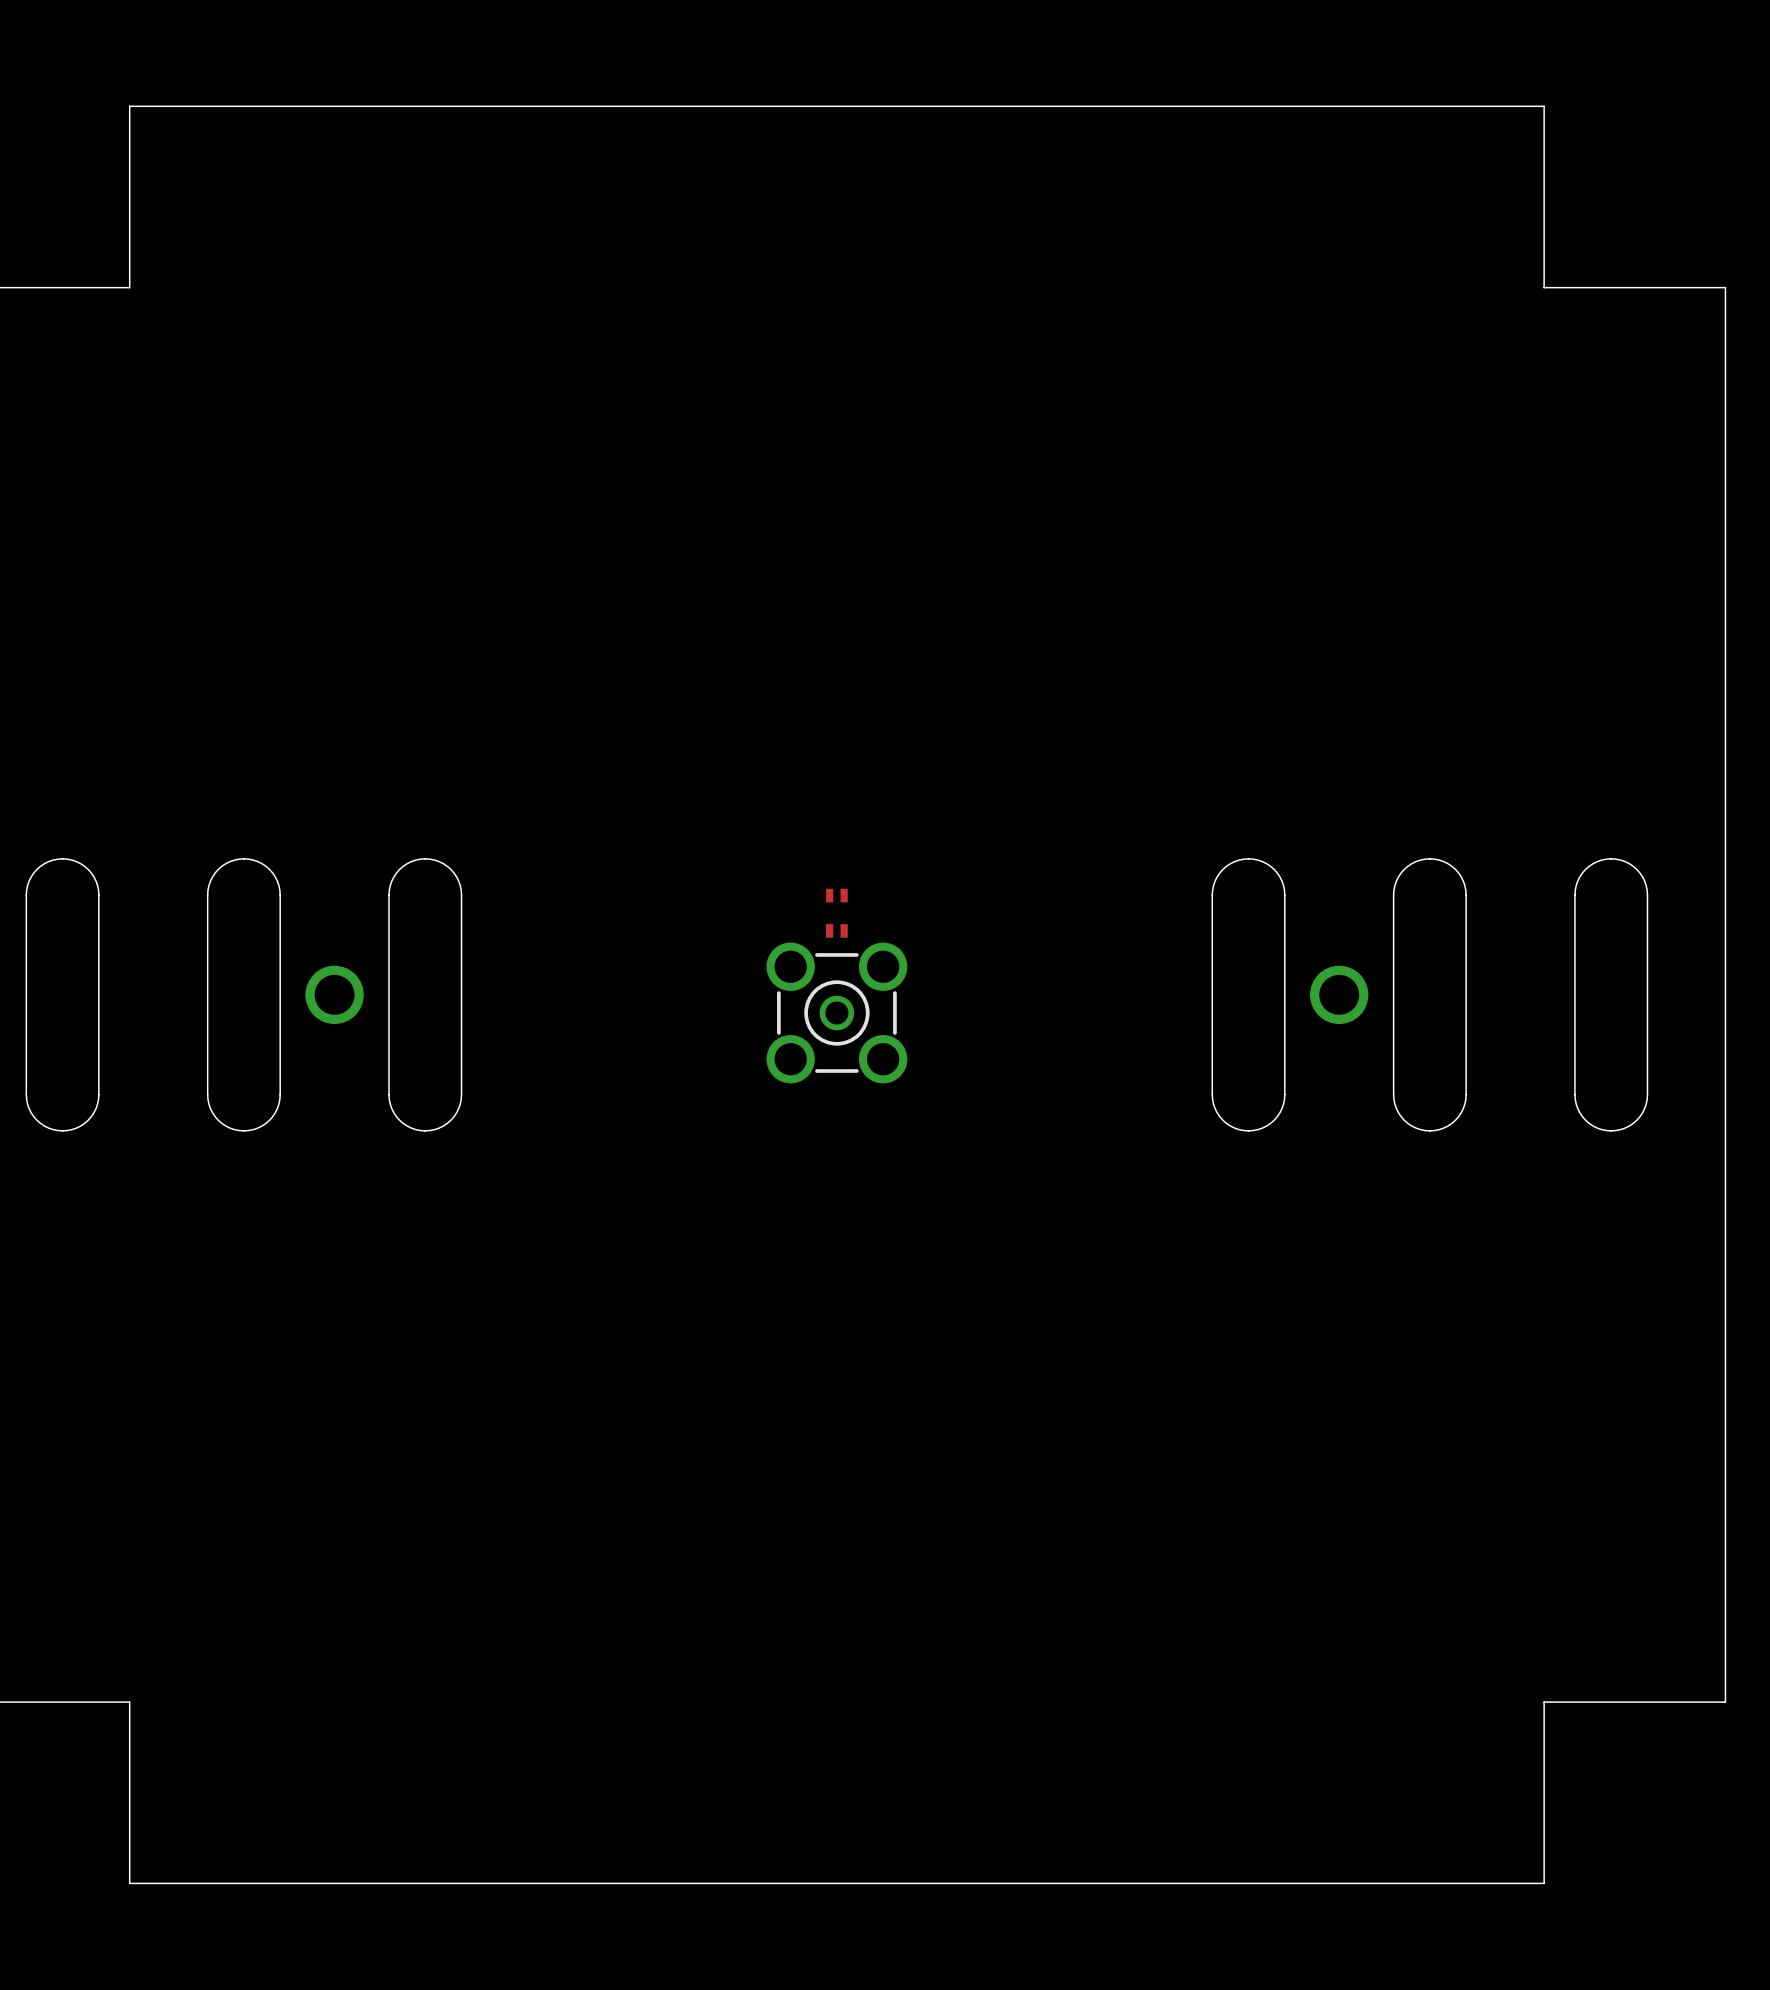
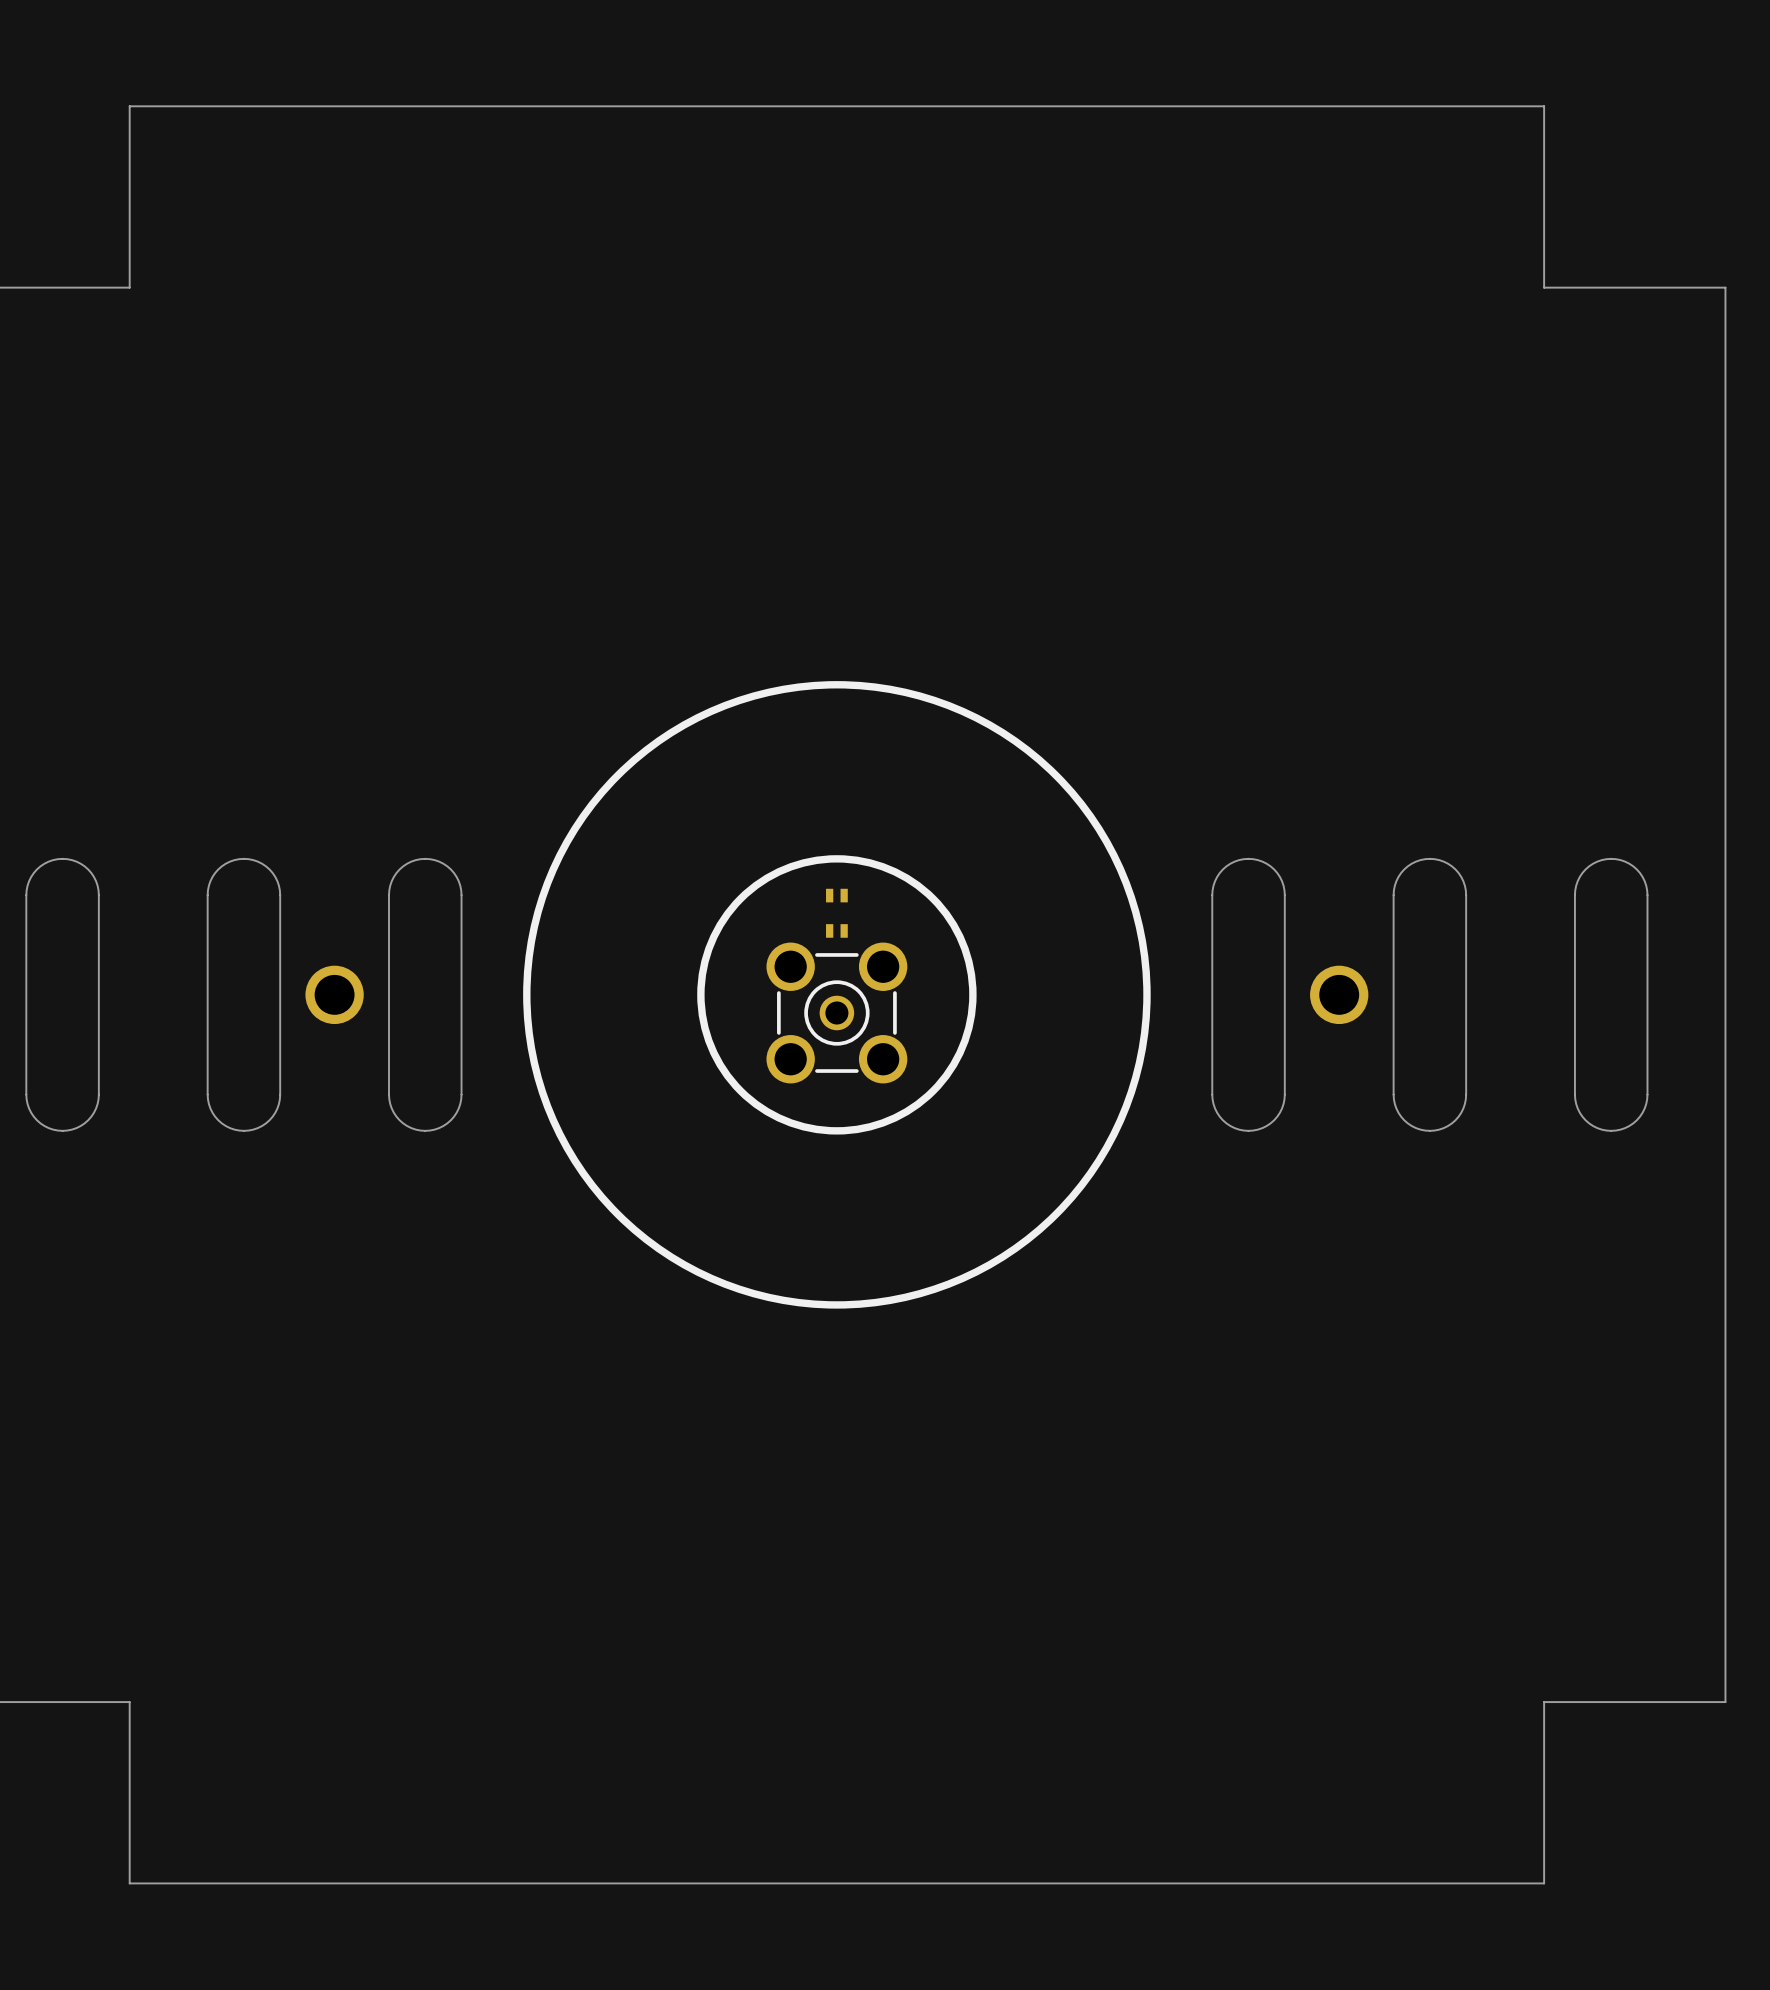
drawing: none -> [523, 681, 1151, 1309]

